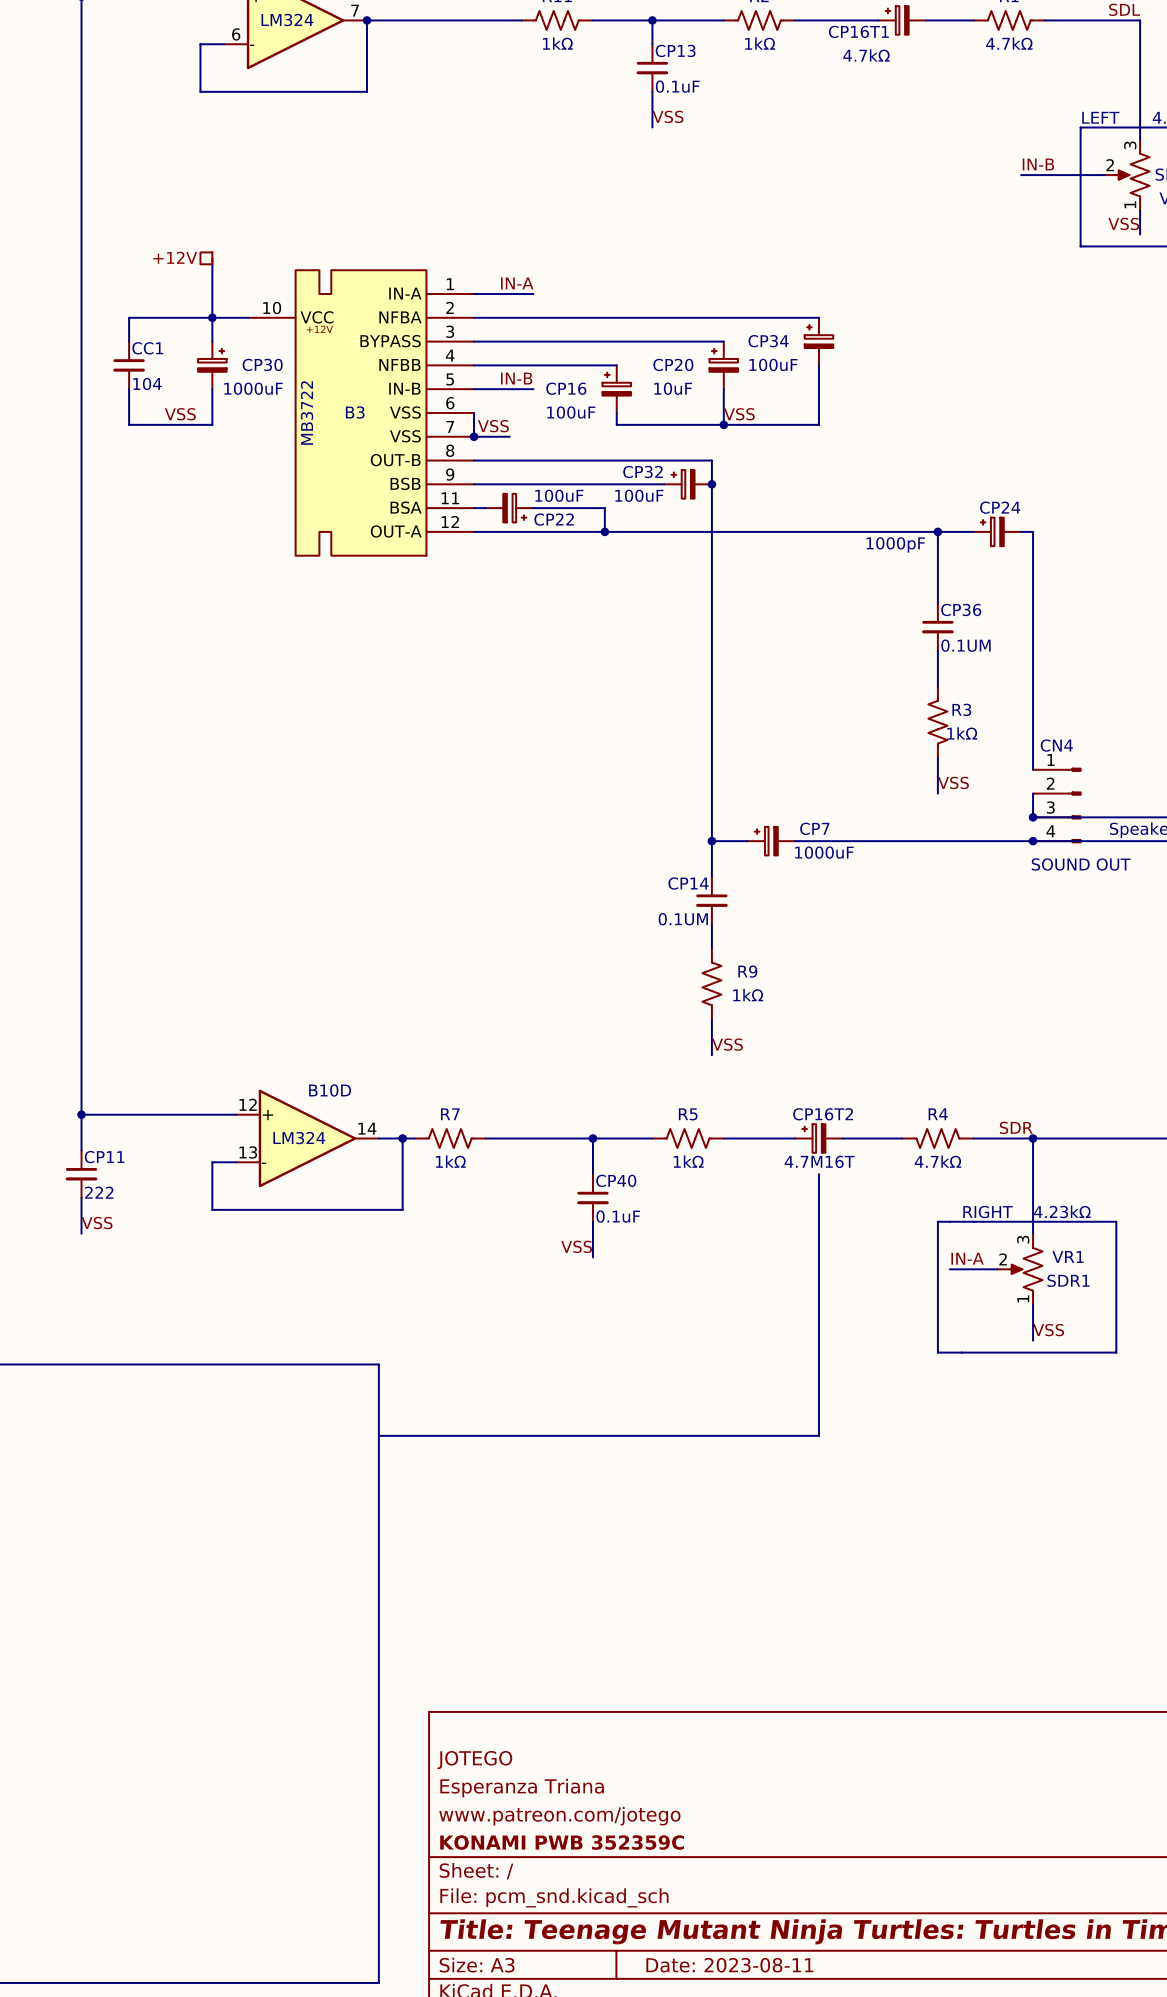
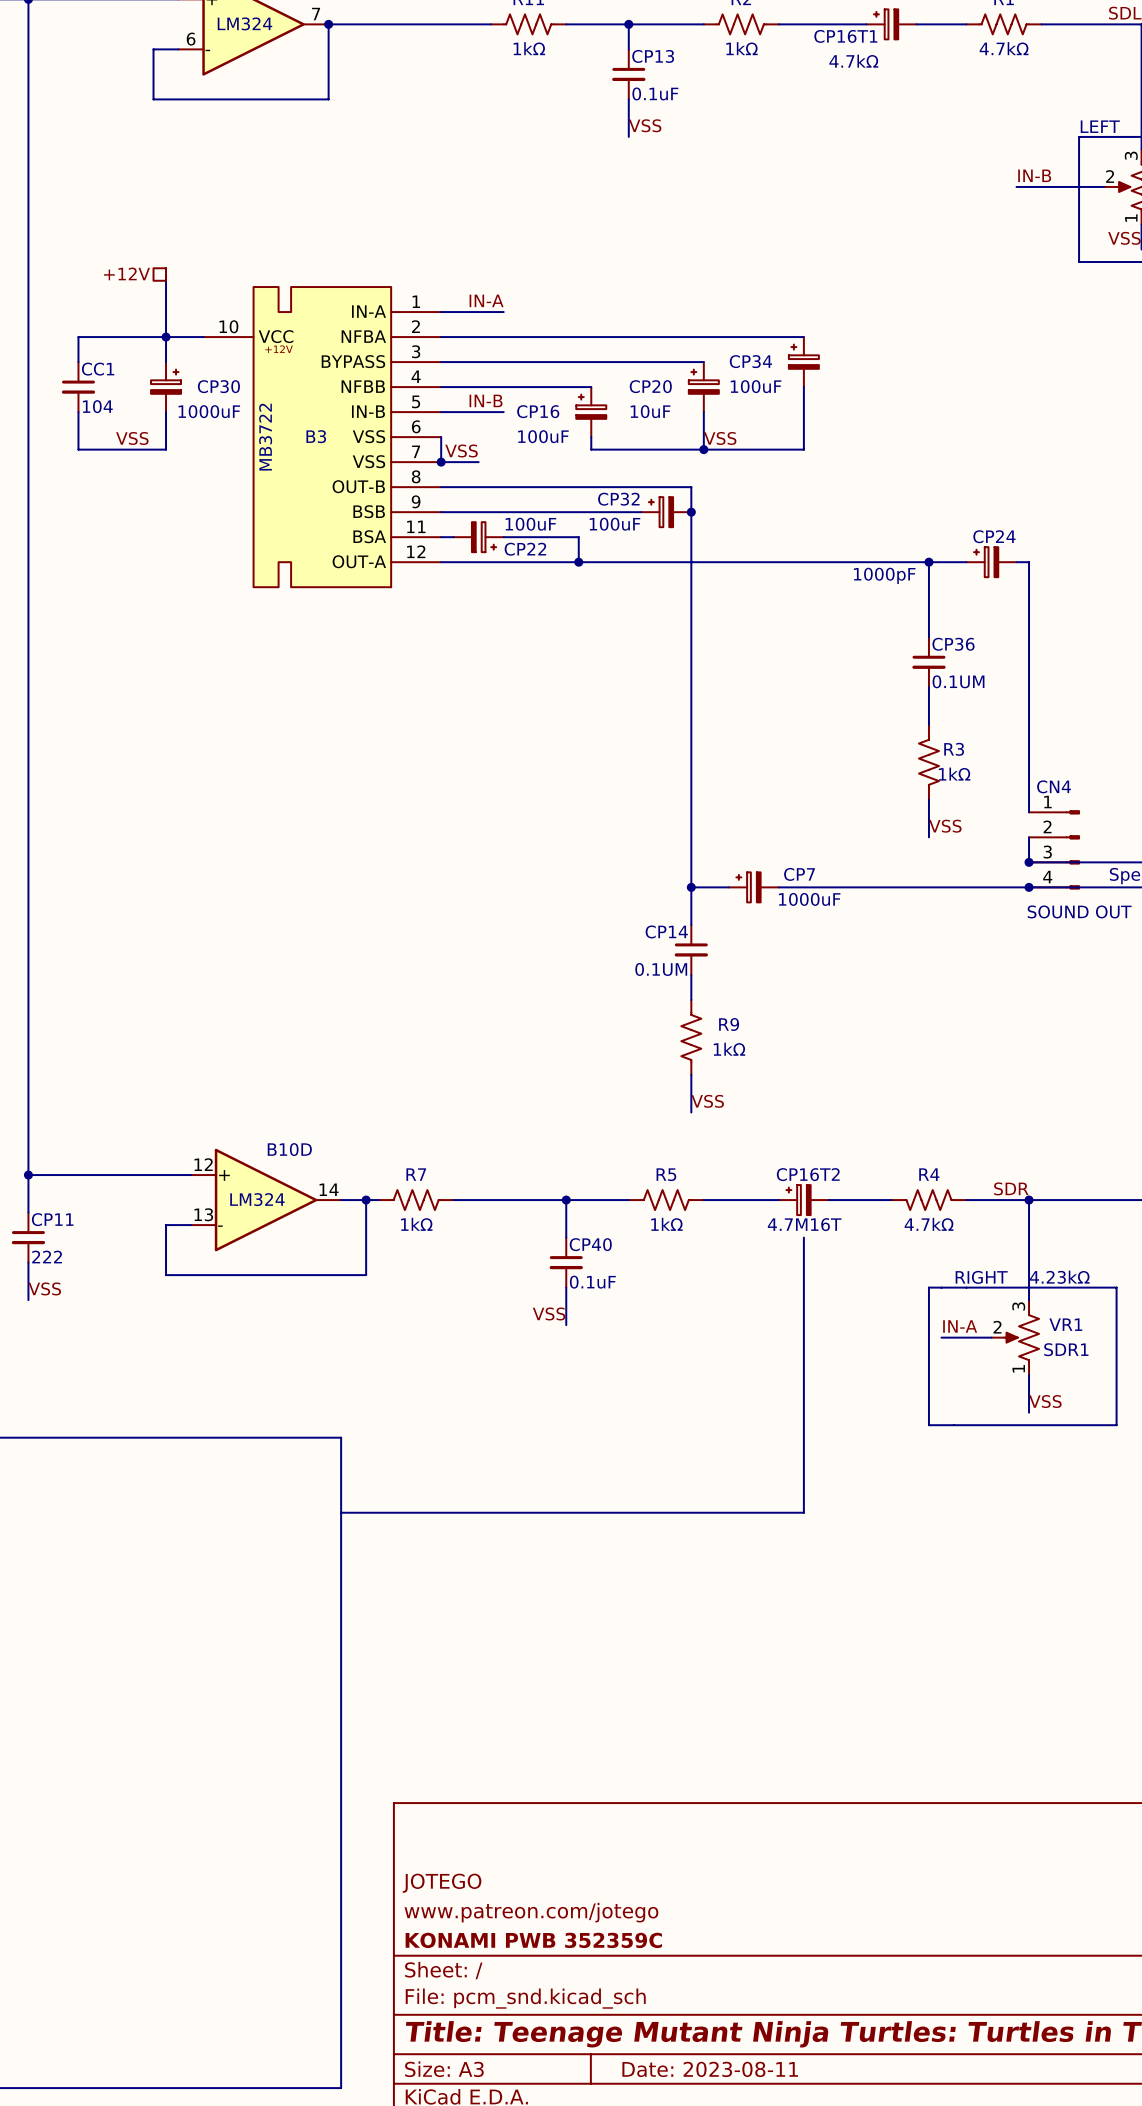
title block: JOTEGO (474, 1760) -> none
title block: Esperanza Triana (522, 1788) -> JOTEGO (442, 1883)

